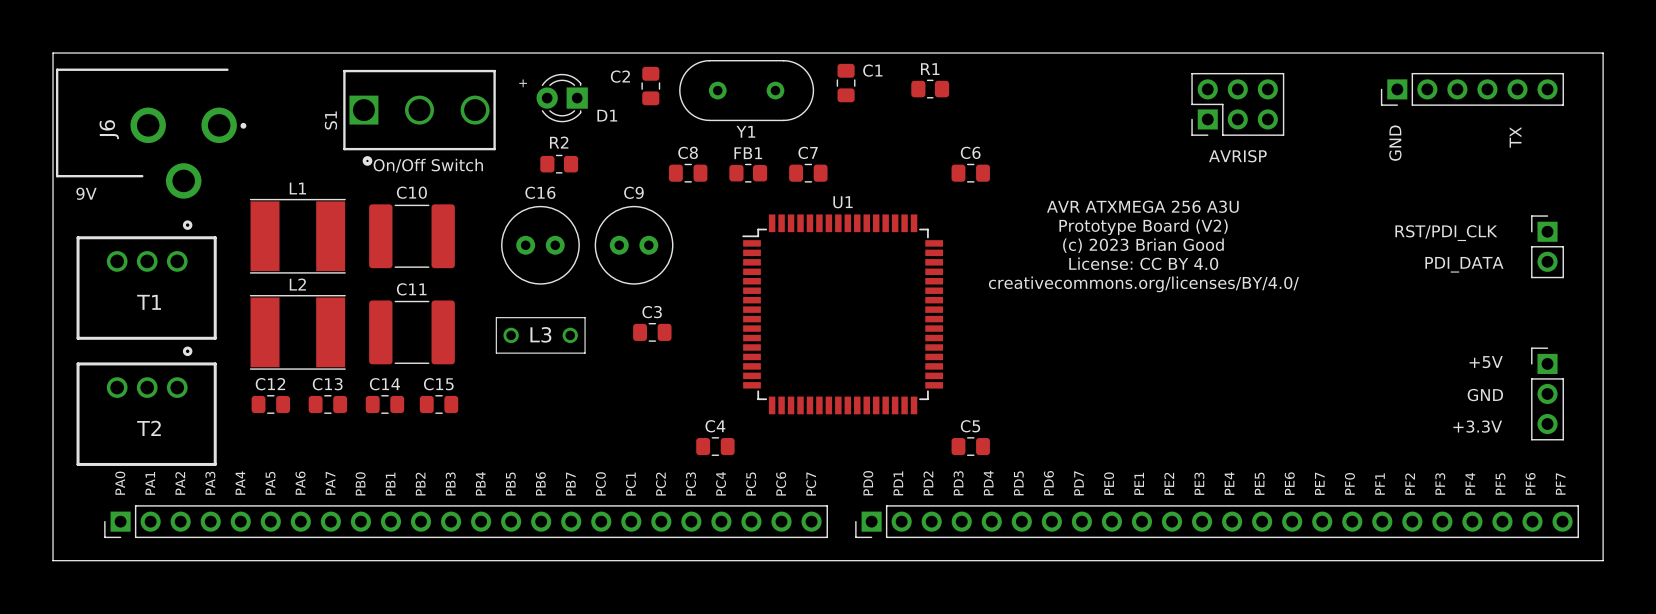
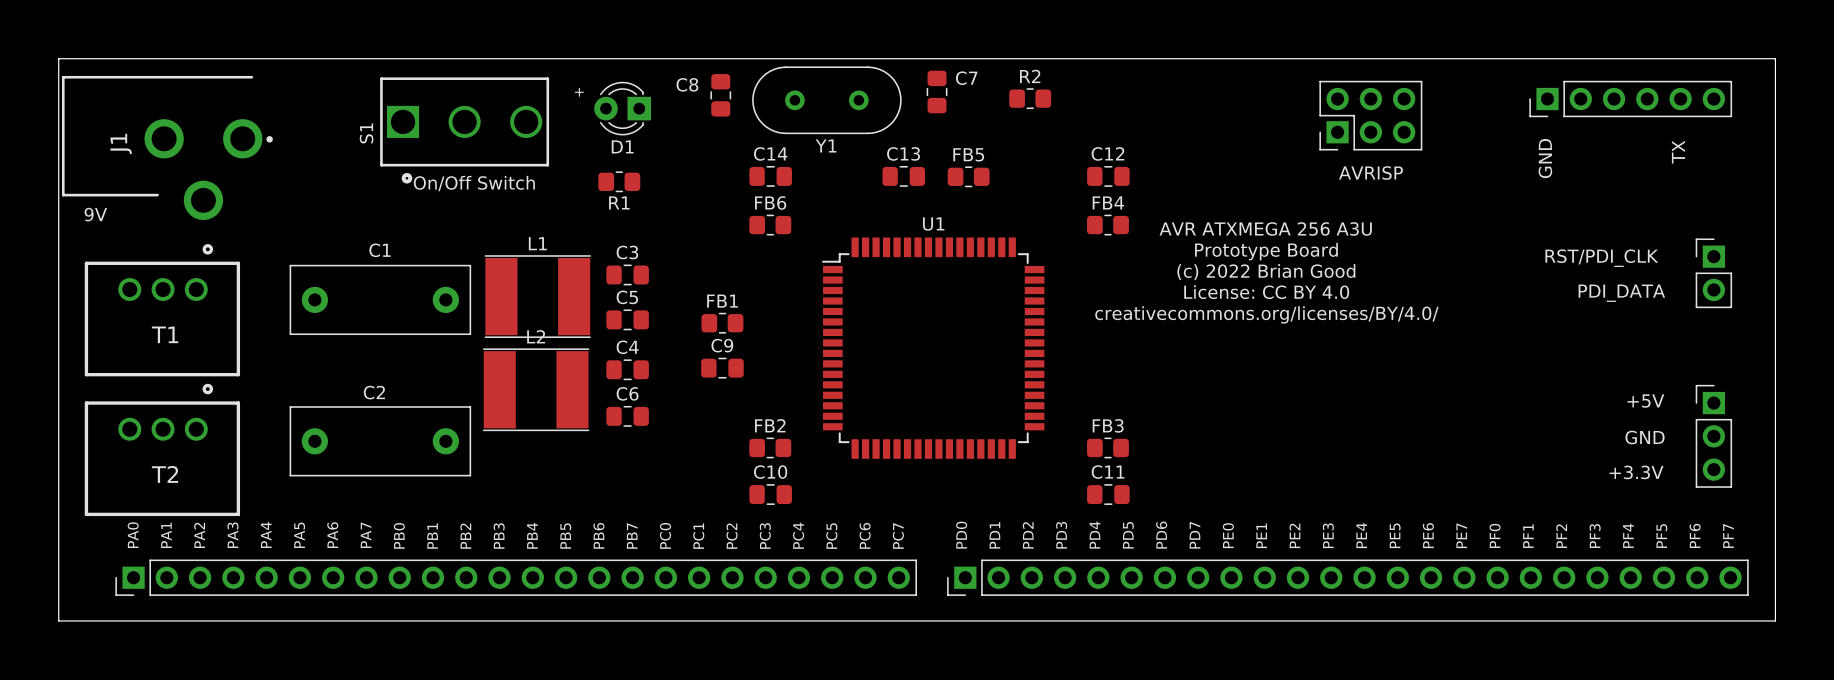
R1 name: R1 (930, 69) -> R2 (1030, 76)
C1 name: C1 (872, 70) -> C7 (966, 78)
C2 name: C2 (620, 76) -> C8 (687, 84)
D1 name position: D1 (607, 115) -> D1 (622, 146)
J6 name: J6 (109, 129) -> J1 (121, 143)
R2 name: R2 (559, 142) -> R1 (619, 202)
FB5: none -> (968, 176)
C8: (688, 173) -> none
FB1 position: (748, 173) -> (722, 323)
C7: (808, 173) -> none
C6 position: (970, 173) -> (627, 416)
FB6: none -> (770, 225)
FB4: none -> (1107, 225)
C10 footprint: [369, 204, 455, 269] -> [749, 484, 792, 505]
text: Prototype Board (V2) (1143, 227) -> Prototype Board (1266, 251)
L1 position: (297, 236) -> (537, 296)
C16: (540, 245) -> none
C9: (634, 245) -> none
text: (c) 2023 Brian Good (1143, 245) -> (c) 2022 Brian Good (1266, 272)
C3: none -> (627, 274)
C1: none -> (380, 299)
C11 footprint: [369, 300, 455, 365] -> [1087, 484, 1130, 505]
C3 name: C3 (652, 312) -> C9 (722, 345)
L2 position: (297, 332) -> (536, 389)
L3: (540, 335) -> none
C2: none -> (380, 441)
C12 position: (270, 404) -> (1108, 176)
C13 position: (327, 404) -> (903, 176)
C14 position: (384, 404) -> (770, 176)
C15: (439, 404) -> none
FB2: none -> (770, 447)
FB3: none -> (1107, 447)
C4 position: (715, 446) -> (627, 369)
C5 position: (970, 446) -> (627, 319)

